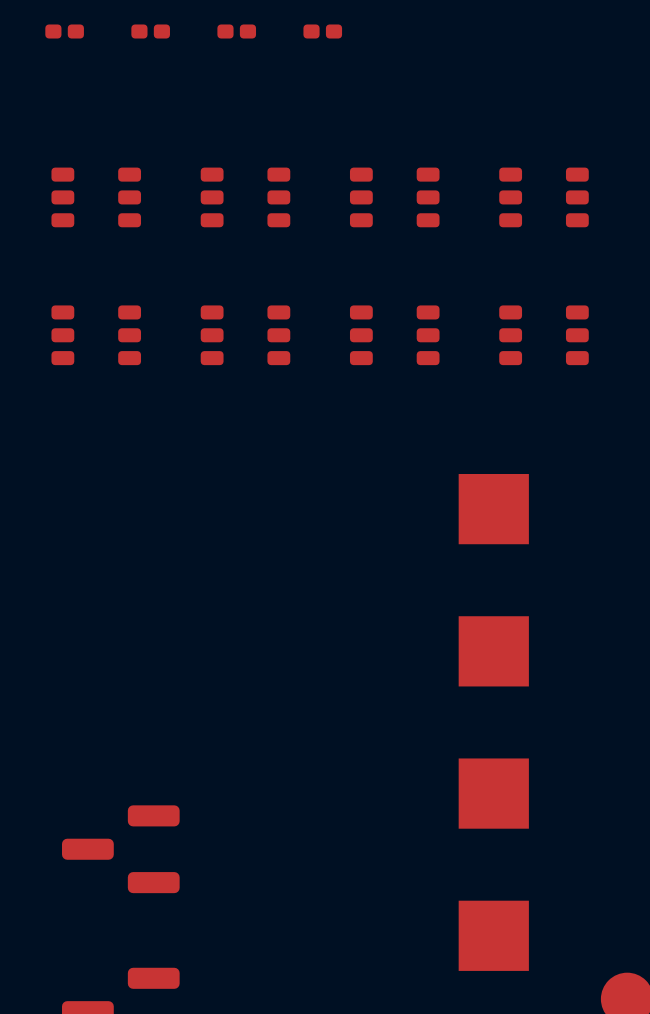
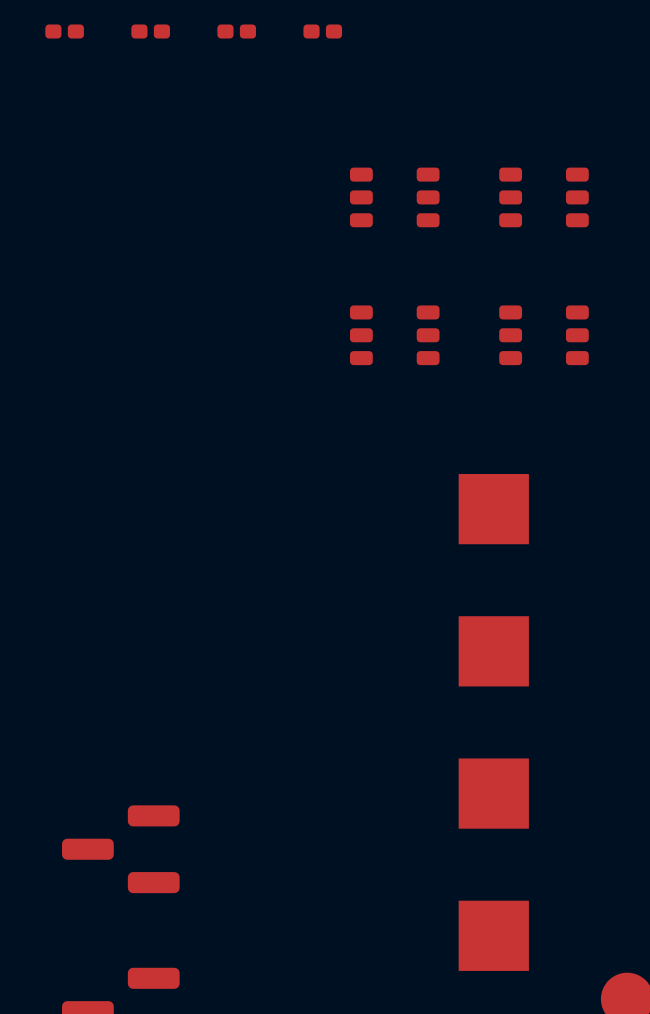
part: (96, 197) -> none
part: (245, 197) -> none
part: (96, 335) -> none
part: (245, 335) -> none

